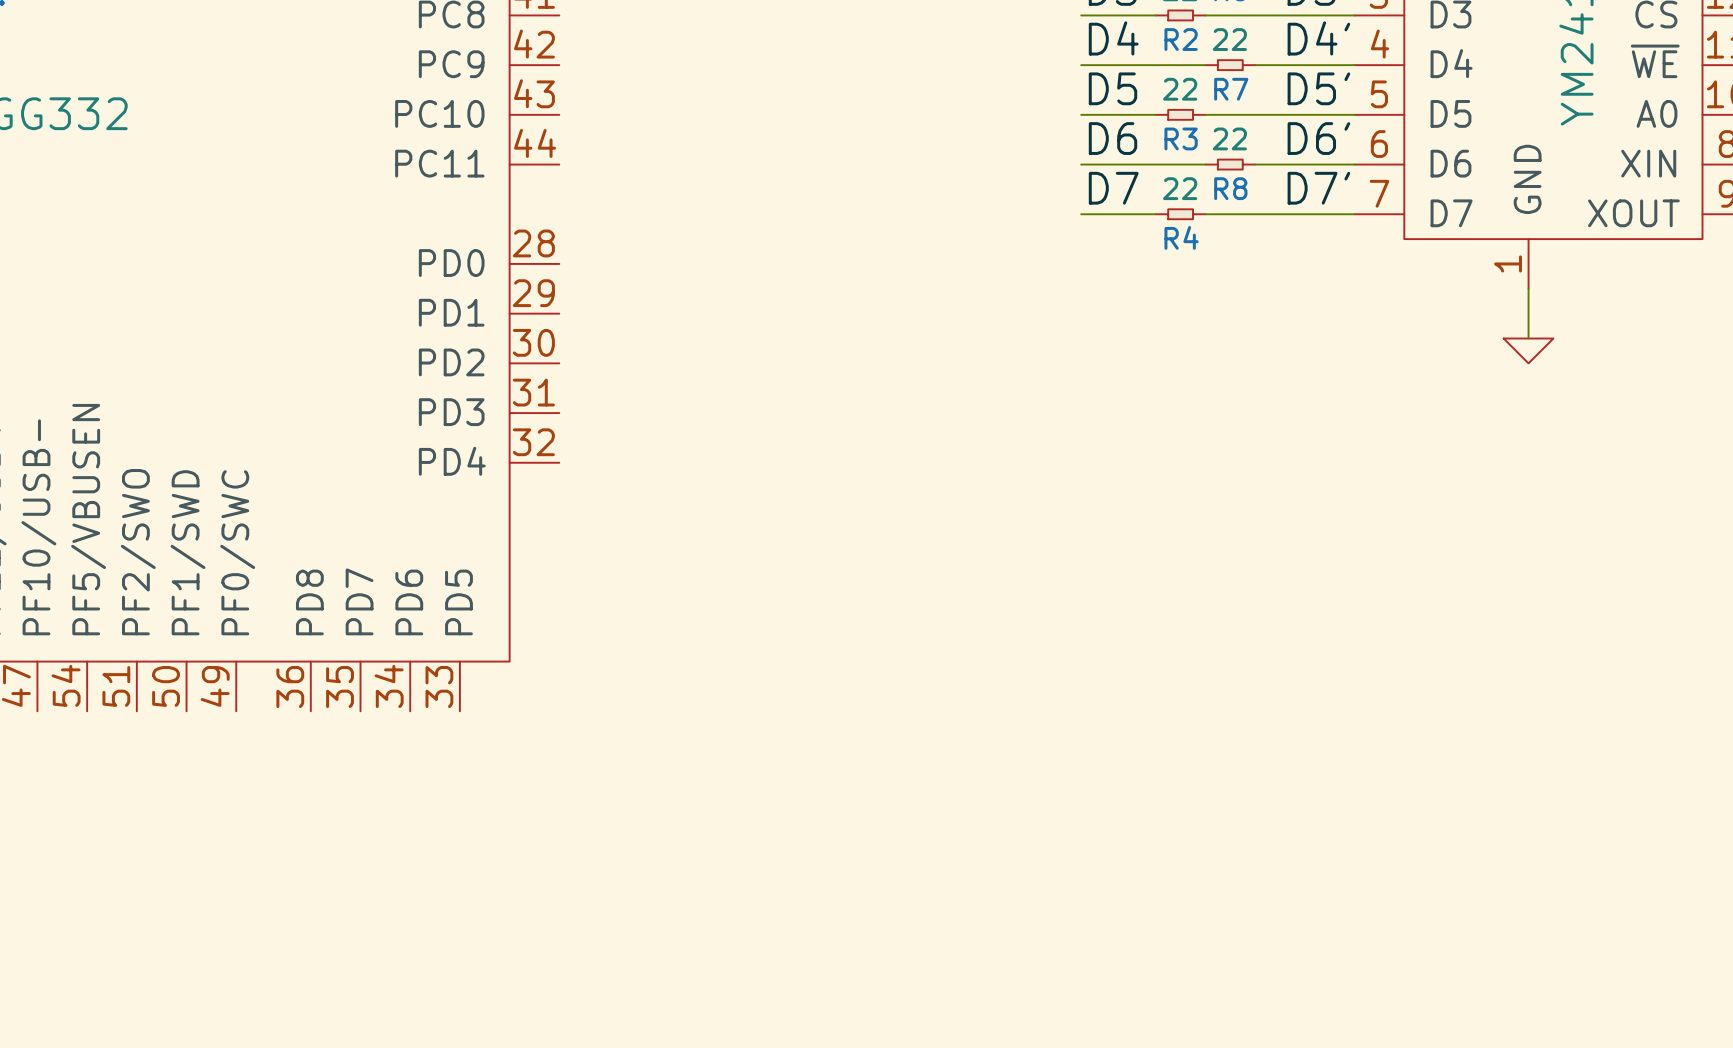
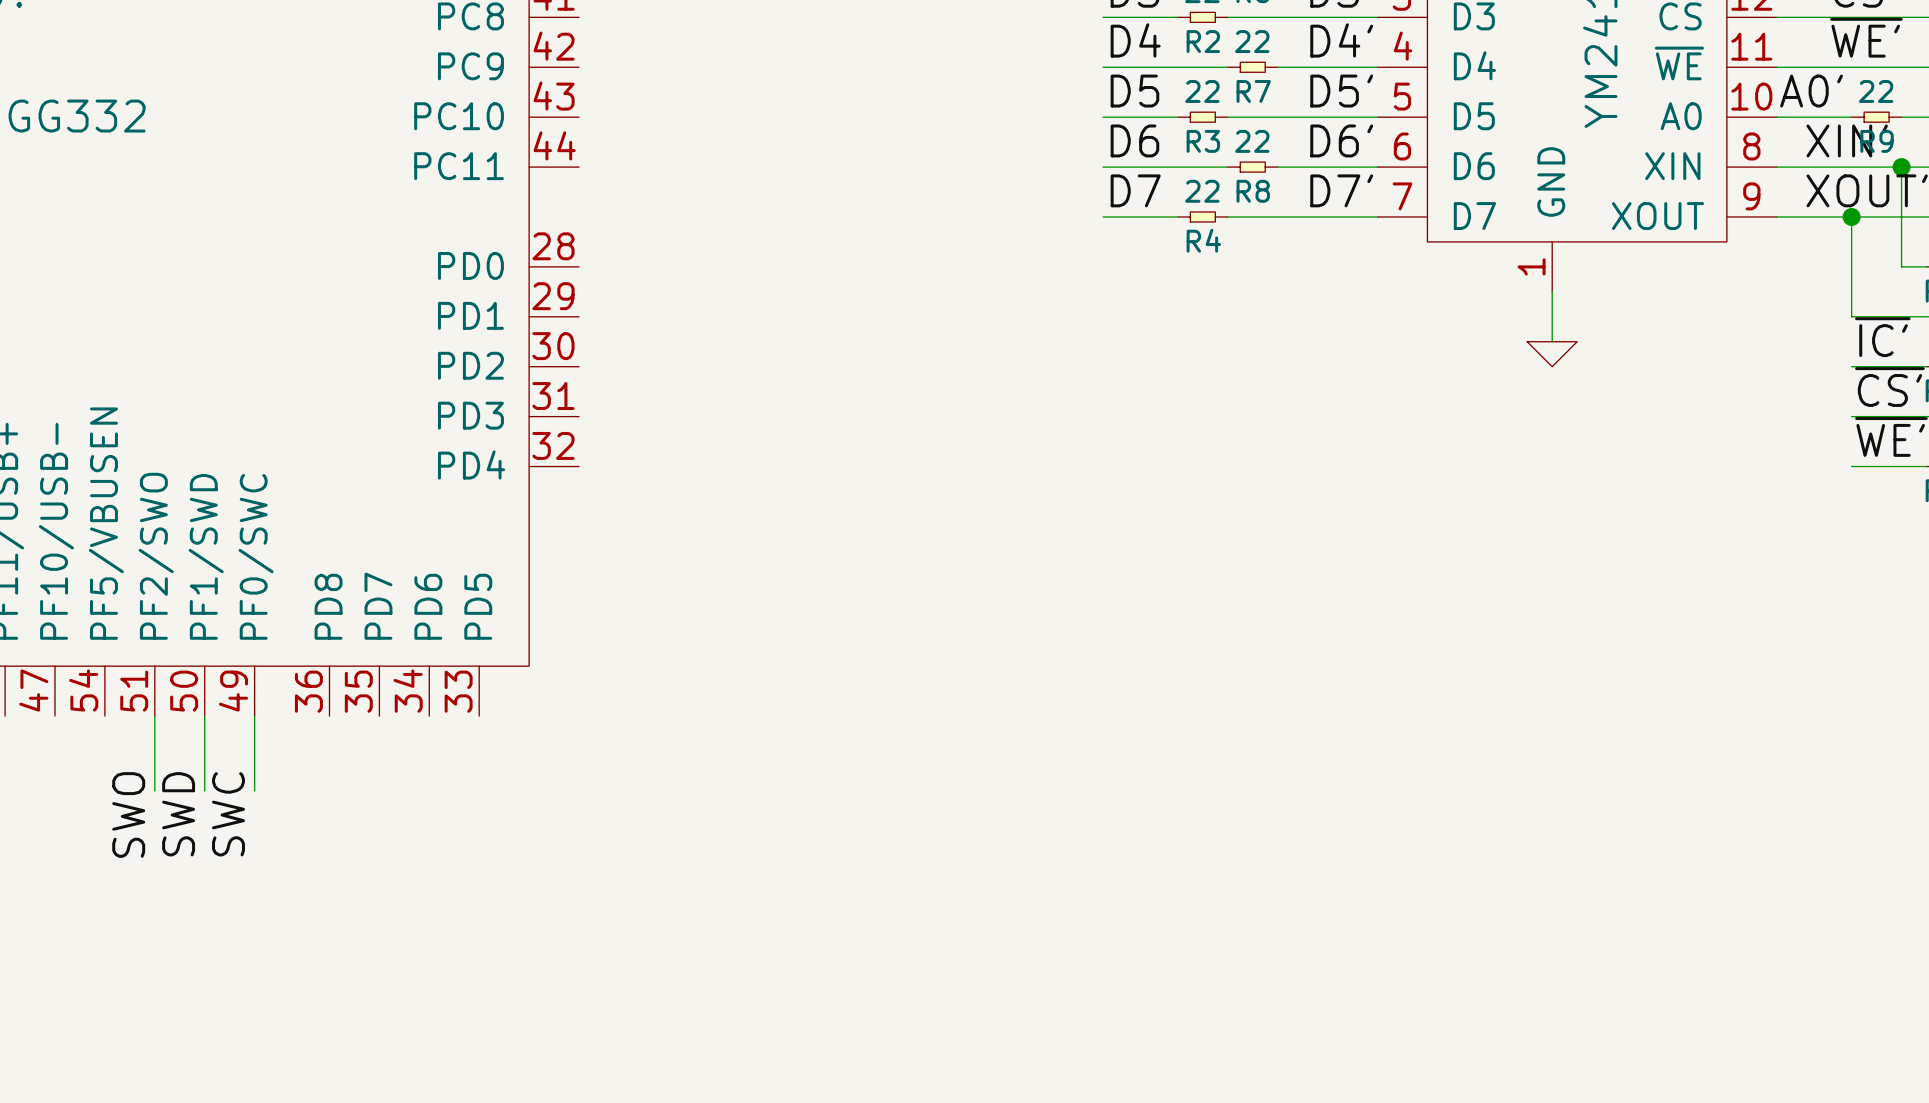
wire: none -> (154, 716) (154, 790)
wire: none -> (204, 716) (204, 790)
wire: none -> (254, 716) (254, 790)
label: none -> SWO (128, 814)
label: none -> SWD (178, 814)
label: none -> SWC (228, 814)

